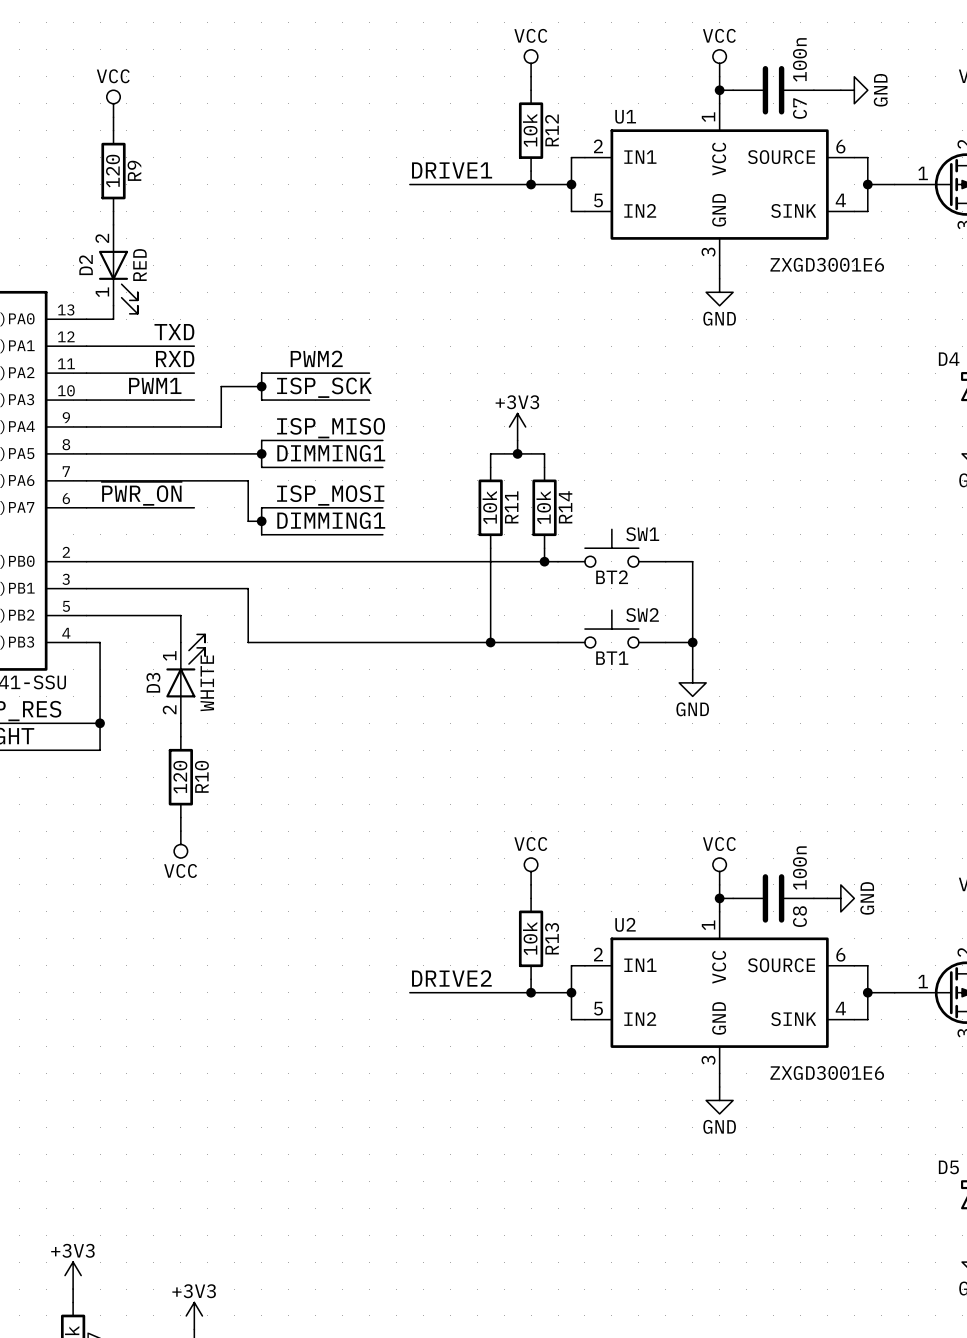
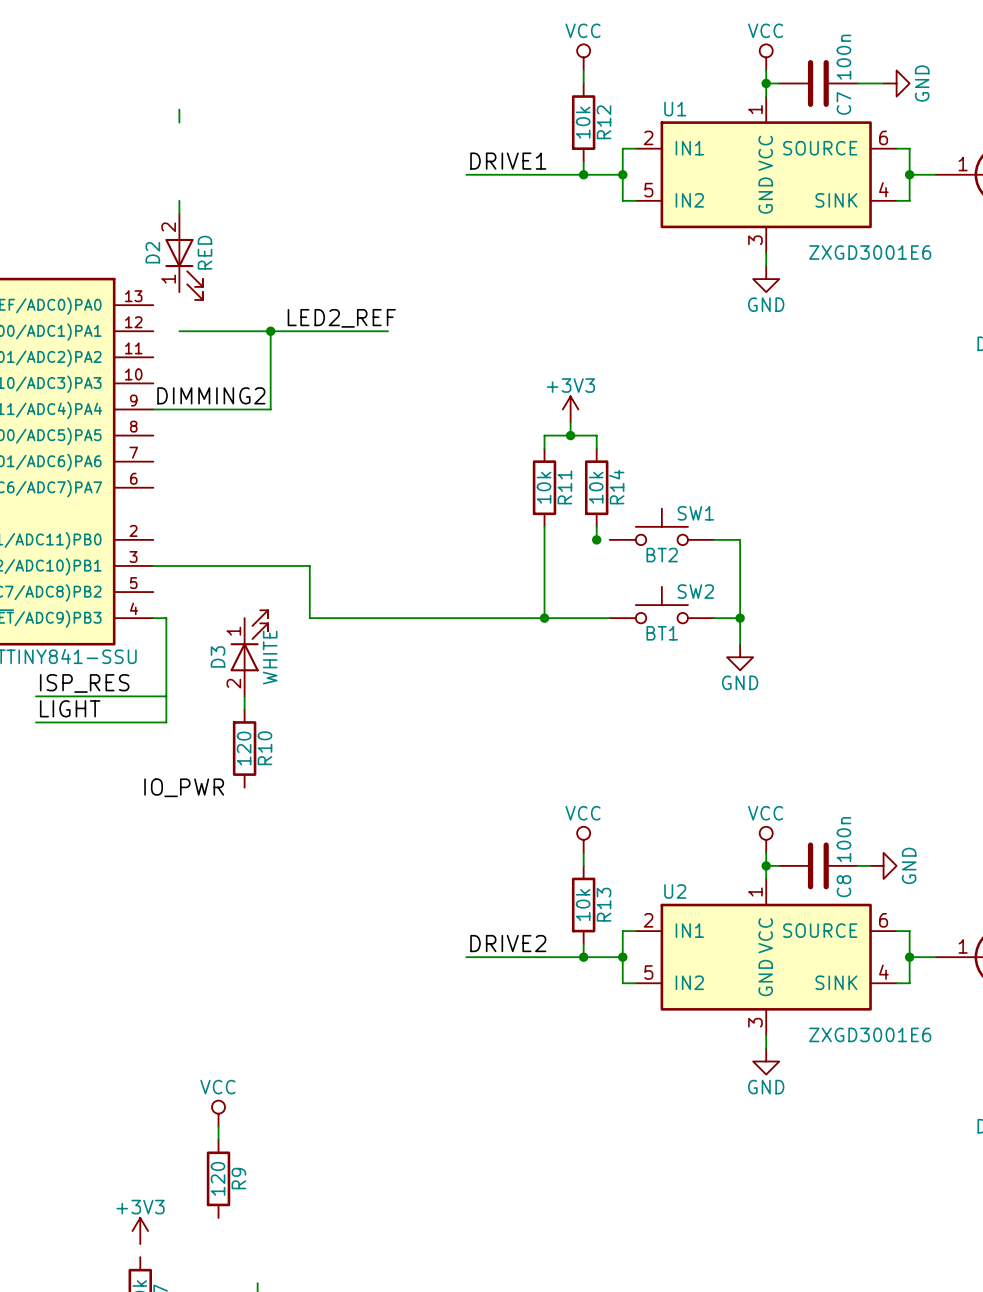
power symbol: VCC (113, 103) -> none
R9 position: (113, 171) -> (218, 1178)
wire: (113, 305) (113, 319) (86, 319) -> none
label: TXD (174, 332) -> none
label: none -> LED2_REF (341, 318)
wire: (86, 346) (113, 346) -> none
wire: none -> (257, 331) (388, 331)
junction: none -> (270, 331)
label: PWM2 (316, 358) -> none
label: RXD (175, 359) -> none
wire: (86, 373) (194, 373) -> none
wire: (369, 373) (261, 373) (261, 400) (369, 400) -> none
label: PWM1 (155, 385) -> none
wire: (261, 386) (221, 386) (221, 426) (207, 426) -> (270, 331) (270, 409)
junction: (261, 386) -> none
label: ISP_SCK (324, 387) -> none
wire: (86, 400) (194, 400) -> none
label: none -> DIMMING2 (211, 395)
label: ISP_MISO (331, 428) -> none
wire: (382, 440) (261, 440) (261, 467) (382, 467) -> none
wire: (86, 453) (261, 453) -> none
junction: (261, 453) -> none
label: DIMMING1 (331, 453) -> none
wire: (86, 480) (248, 480) (248, 521) (261, 521) -> none
label: ~{PWR_ON} (141, 493) -> none
label: ISP_MOSI (330, 495) -> none
wire: (86, 507) (194, 507) -> none
wire: (382, 507) (261, 507) (261, 534) (382, 534) -> none
label: DIMMING1 (331, 520) -> none
junction: (261, 521) -> none
wire: (86, 561) (558, 561) -> none
wire: (86, 615) (180, 615) (180, 642) -> none
junction: (100, 723) -> none
wire: (180, 817) (180, 831) -> none
label: none -> IO_PWR (184, 787)
power symbol: VCC (180, 844) -> none
power symbol: none -> VCC (218, 1113)
wire: (73, 1289) (73, 1302) -> (218, 1126) (218, 1139)
power symbol: +3V3 (194, 1315) -> none

